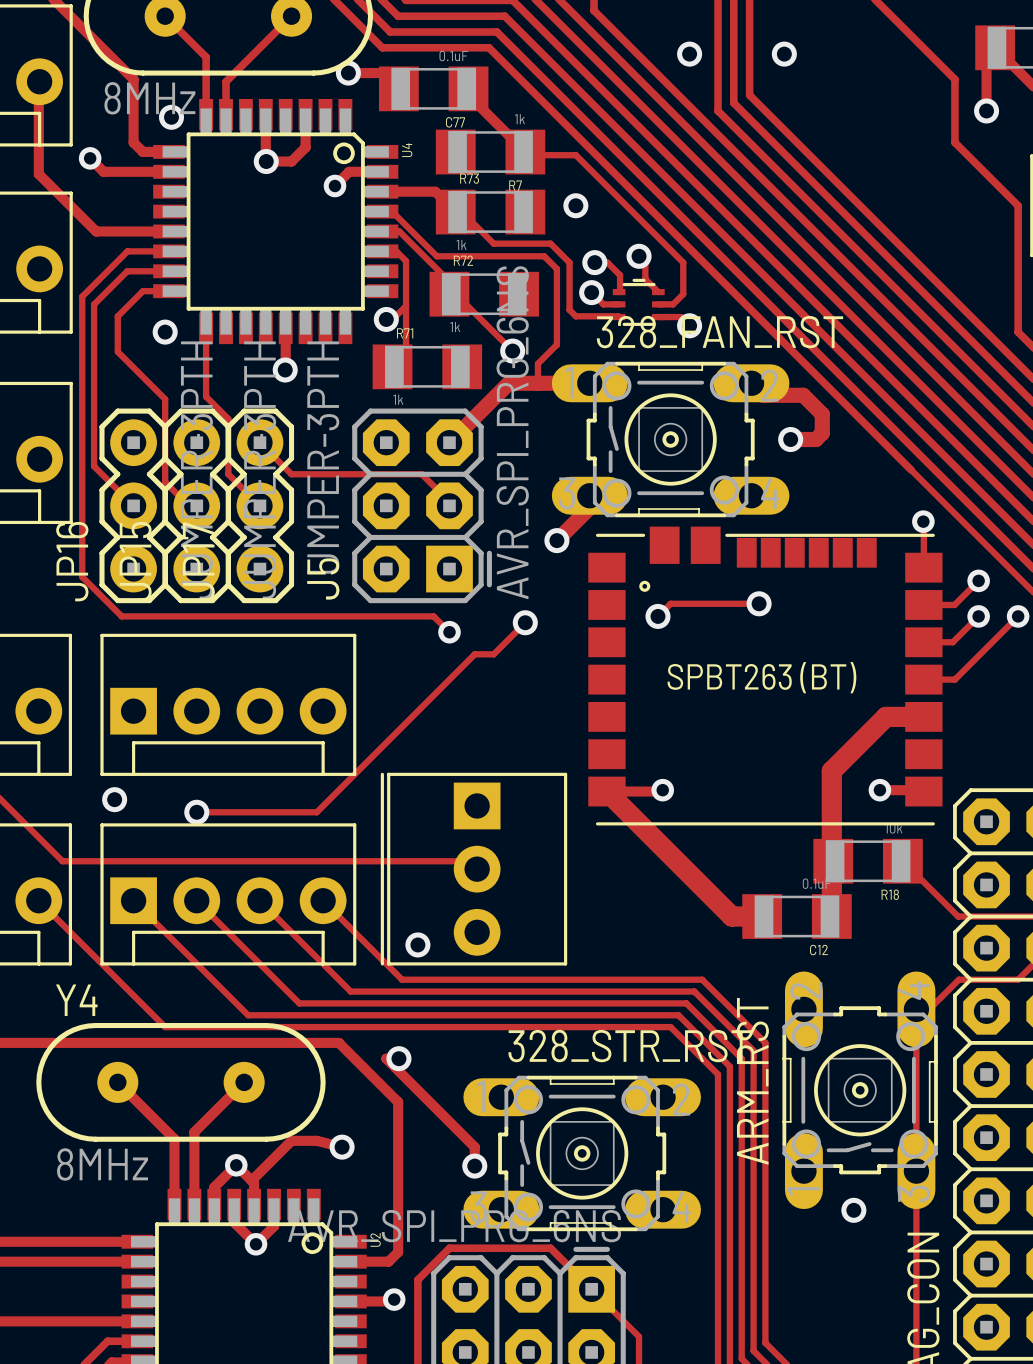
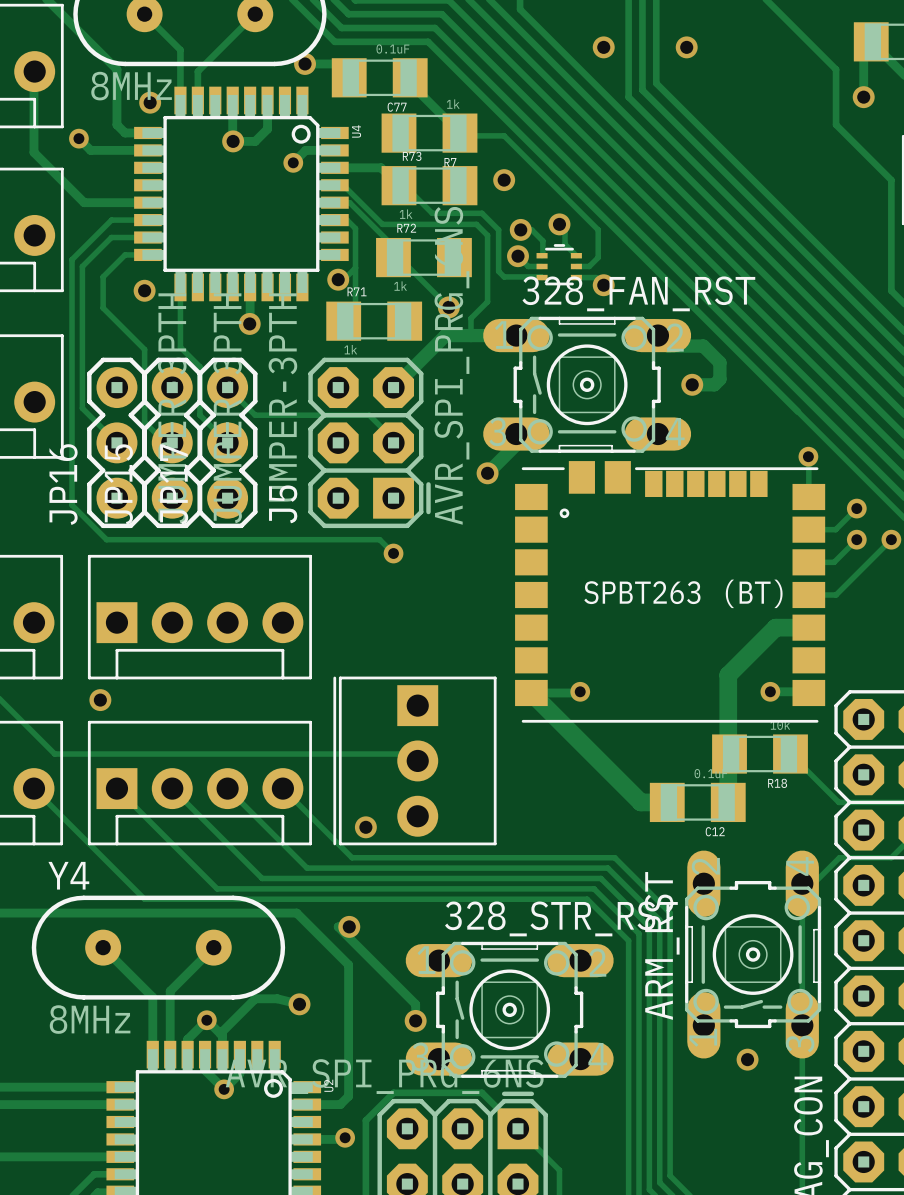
track: (759, 603) (670, 603) (658, 616) -> none
via: (759, 603) -> none
via: (658, 616) -> none
track: (525, 622) (493, 654) (474, 654) (316, 812) (196, 812) -> none
via: (525, 622) -> none
via: (196, 812) -> none

